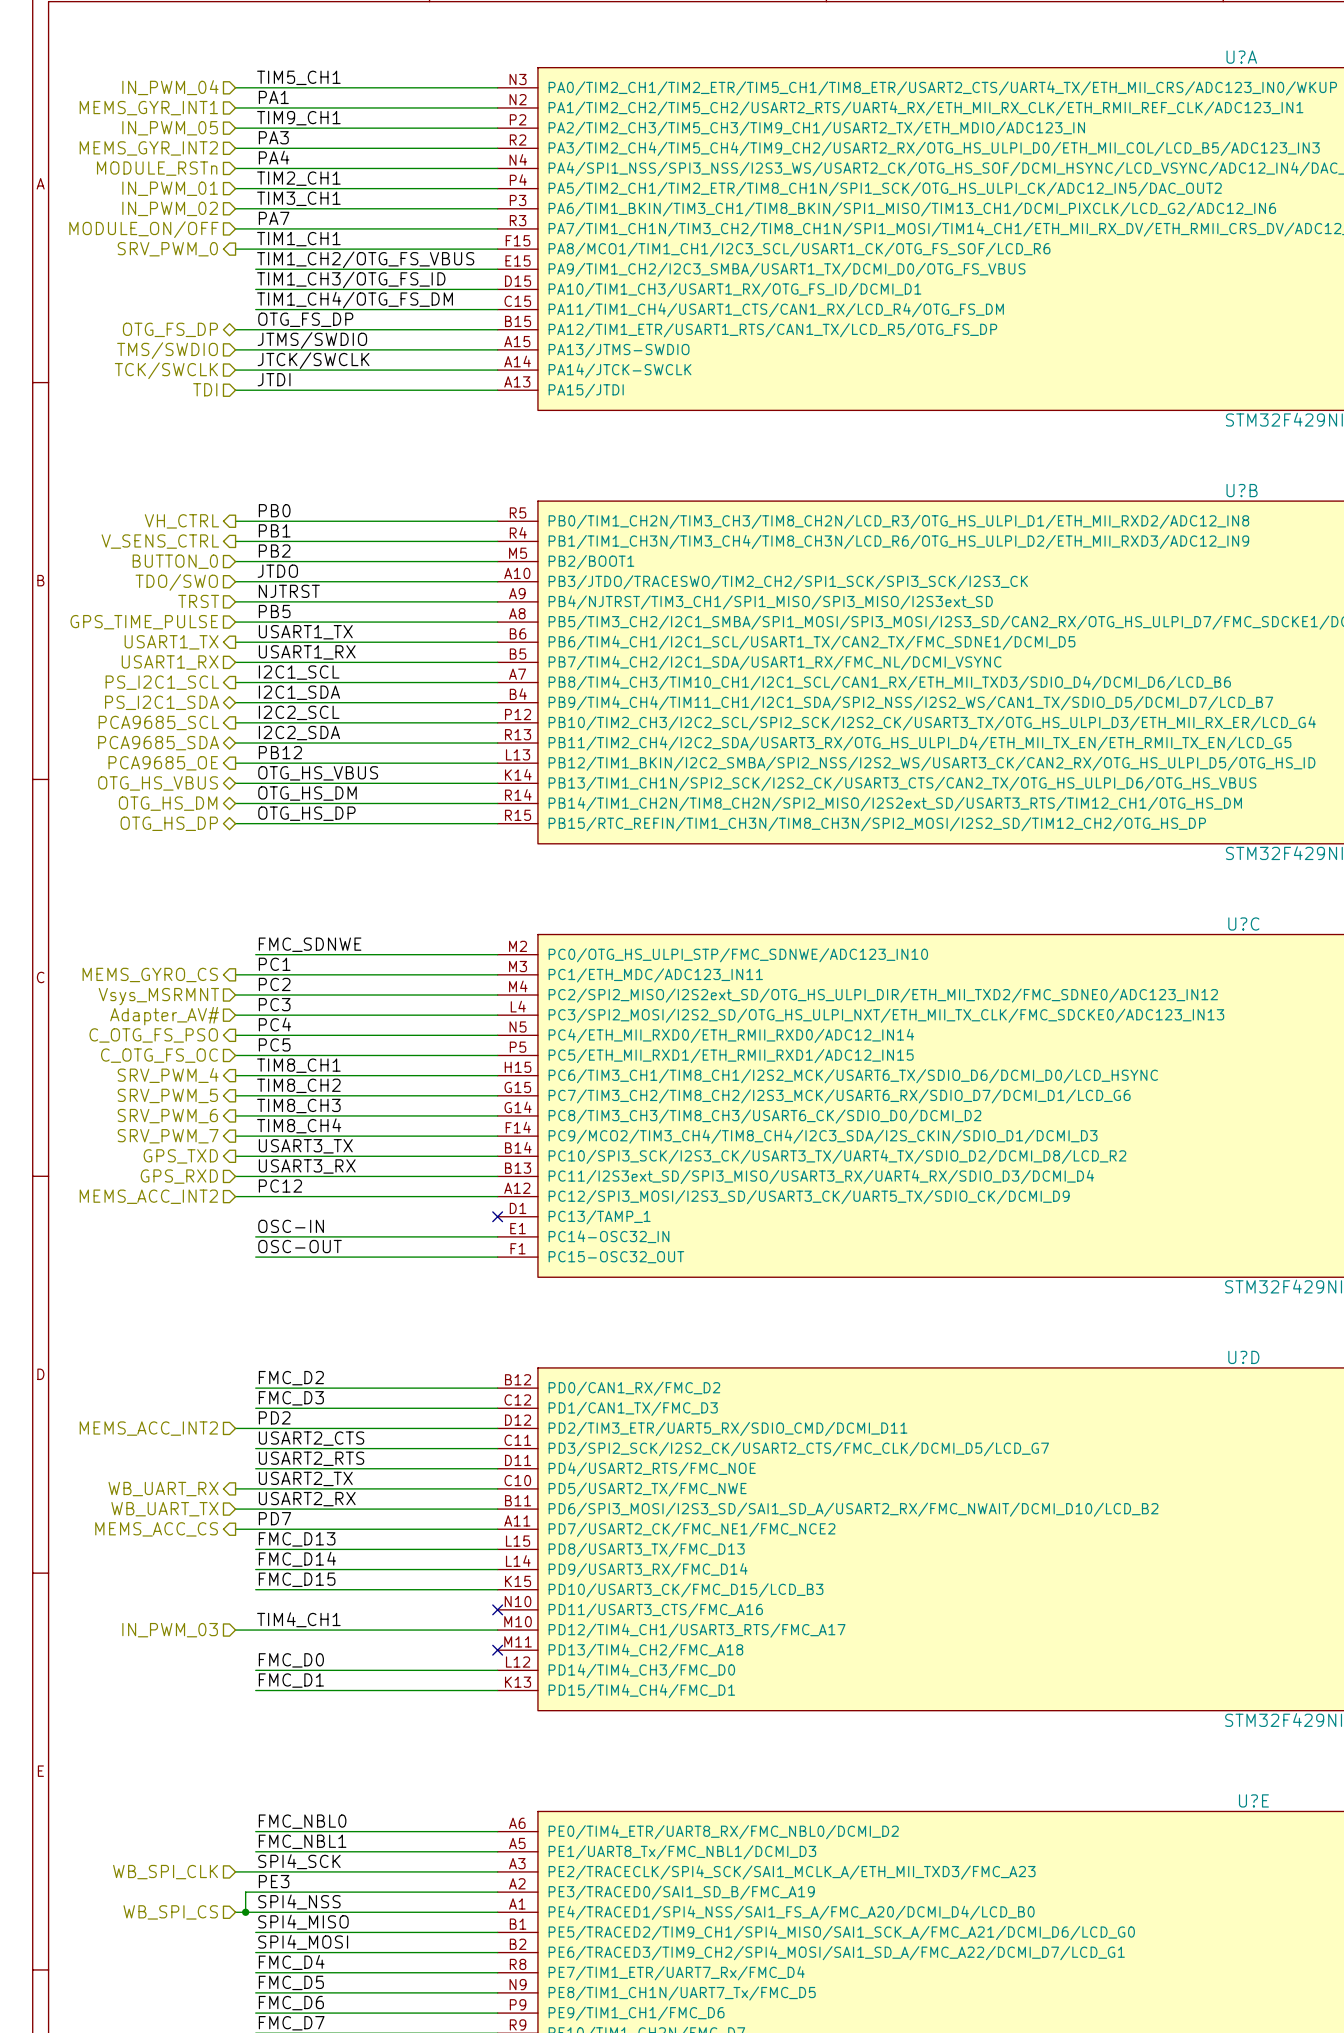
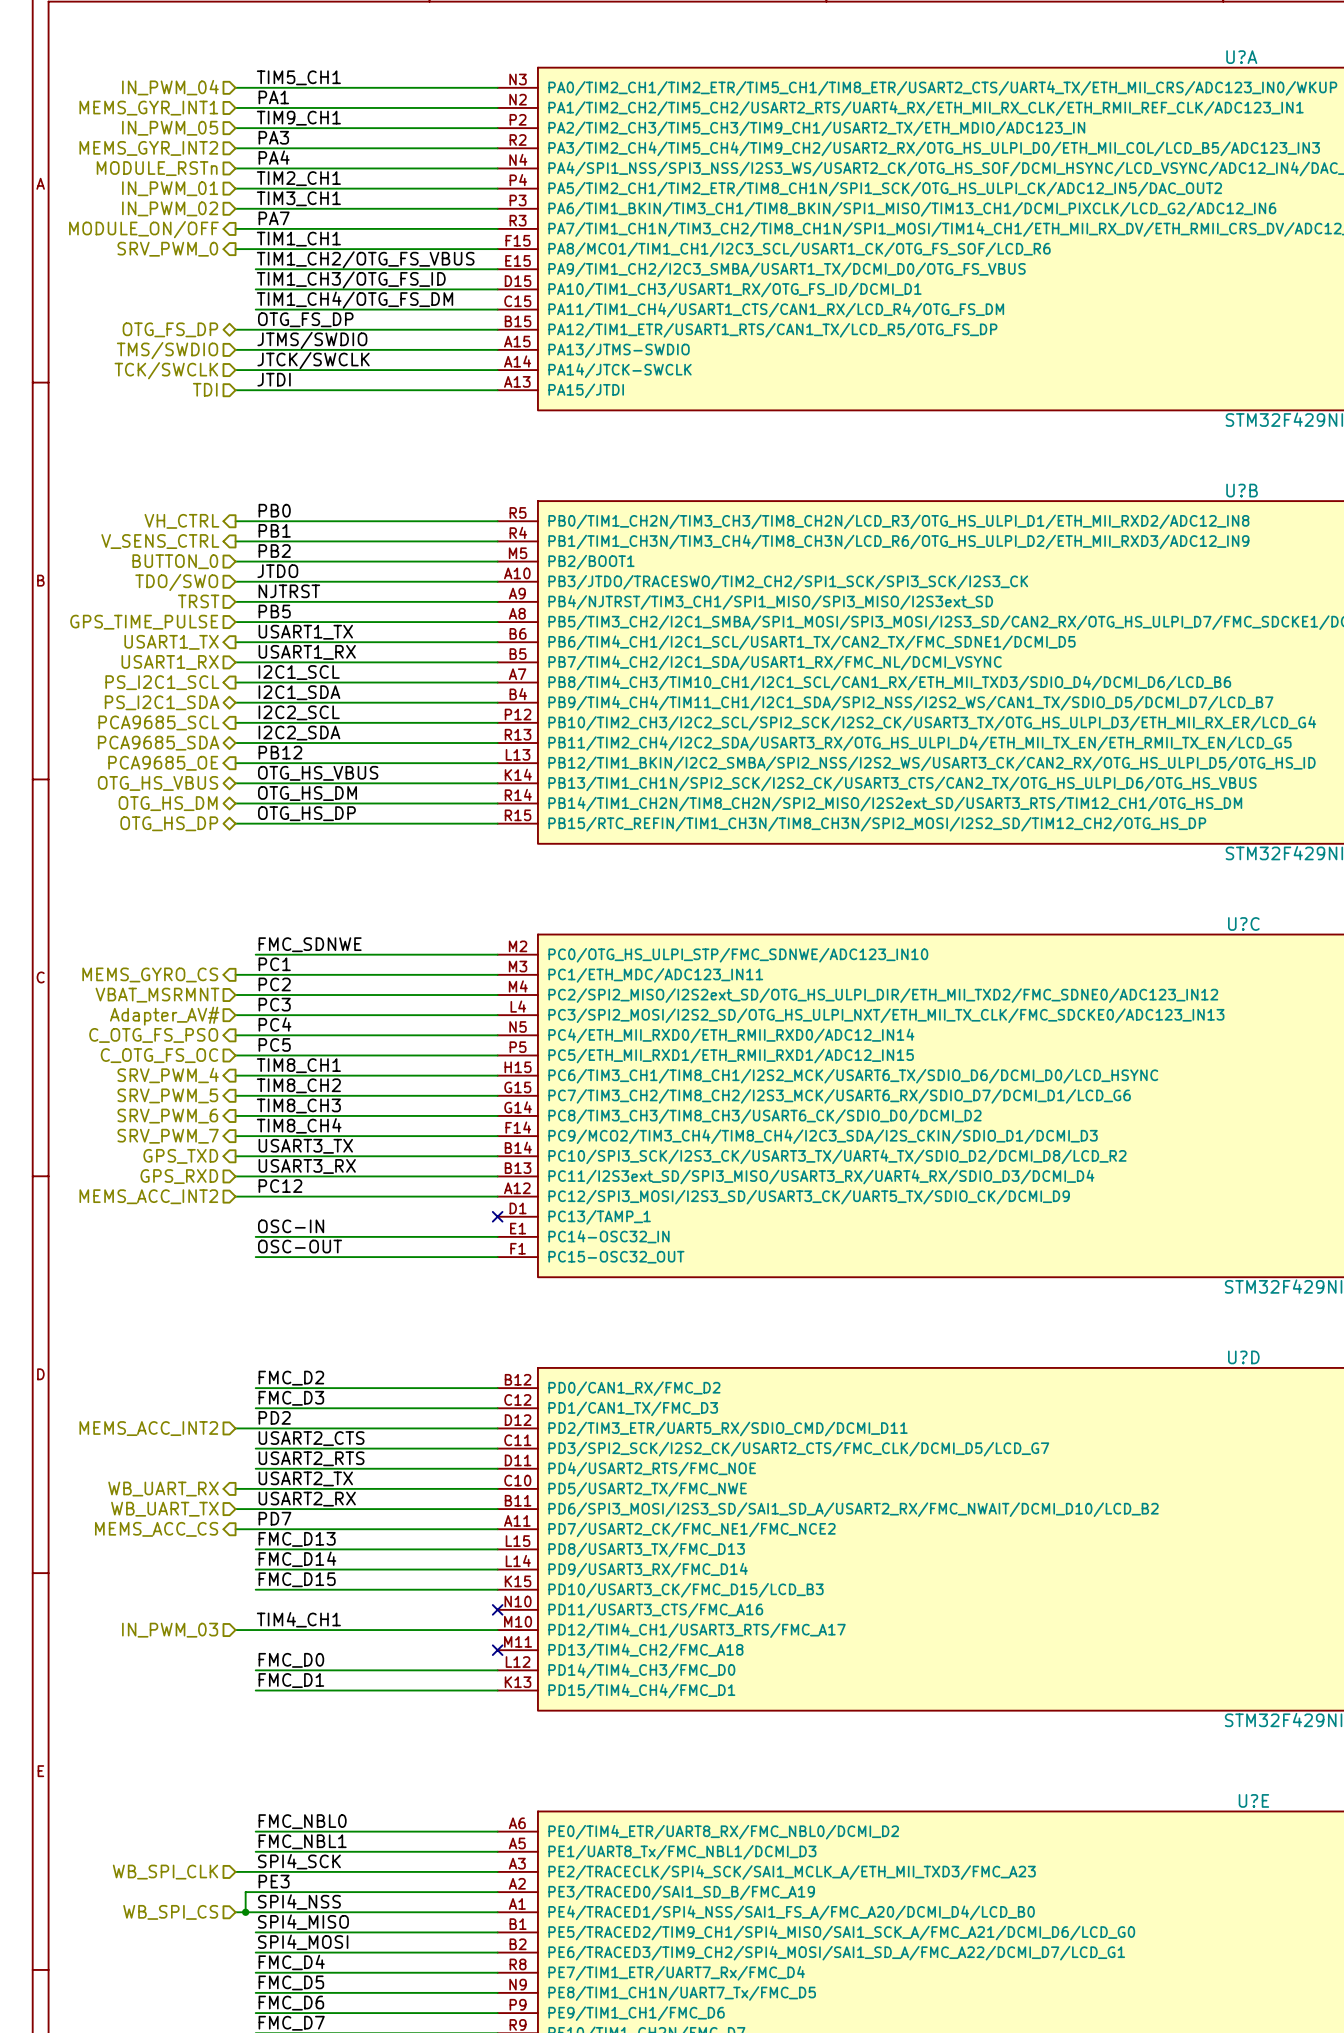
hierarchical label shape: input (143, 229) -> output (143, 229)
hierarchical label: Vsys_MSRMNT (158, 996) -> VBAT_MSRMNT (157, 995)

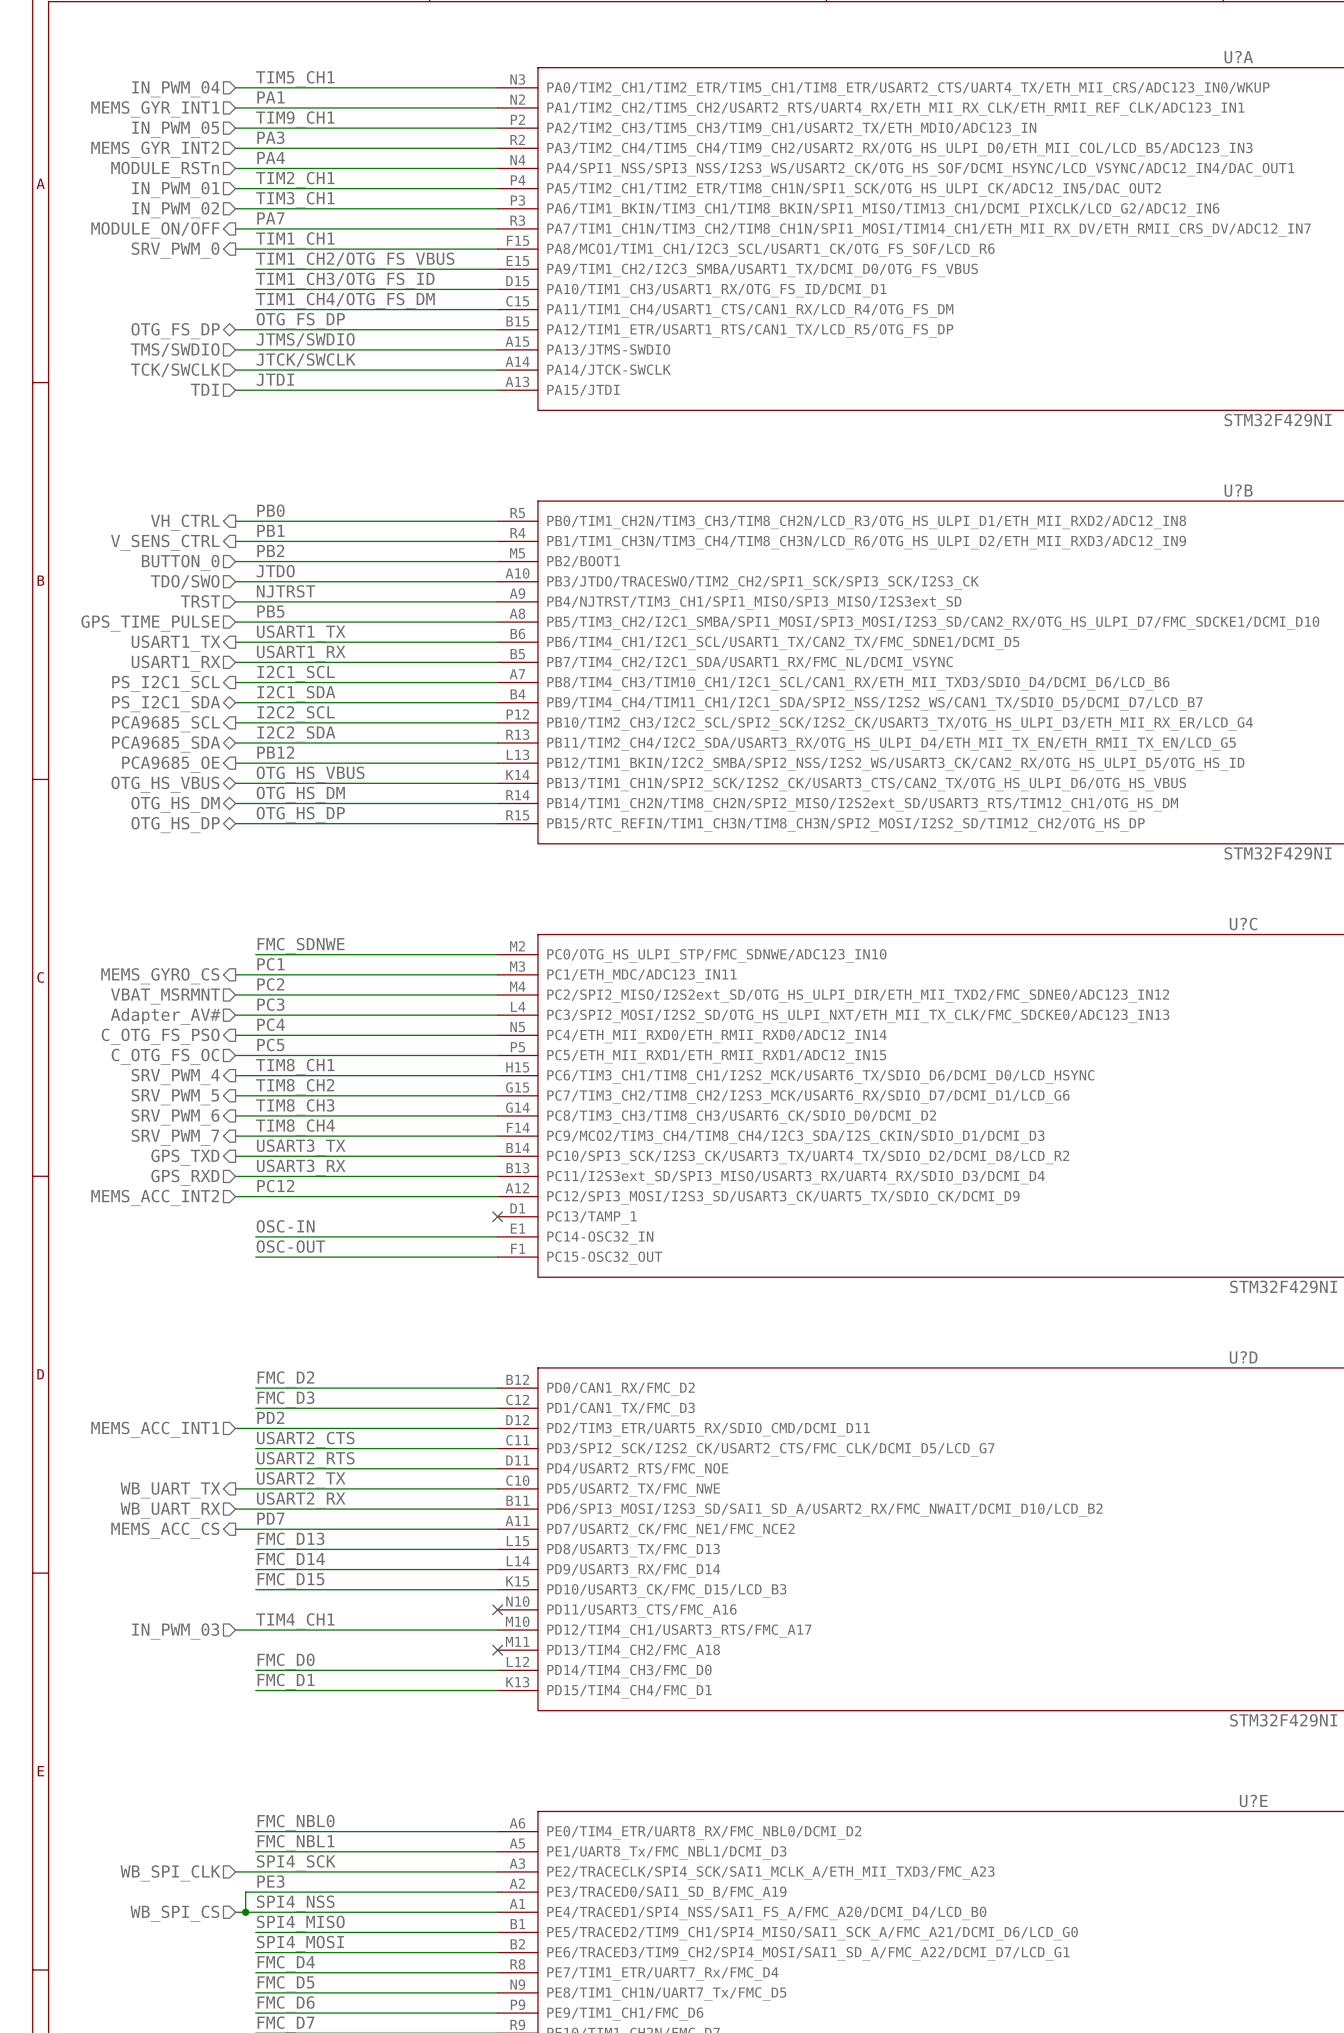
hierarchical label: MEMS_ACC_INT2 (148, 1428) -> MEMS_ACC_INT1 (155, 1429)
hierarchical label: WB_UART_RX (163, 1489) -> WB_UART_TX (170, 1490)
hierarchical label: WB_UART_TX (164, 1509) -> WB_UART_RX (170, 1510)

